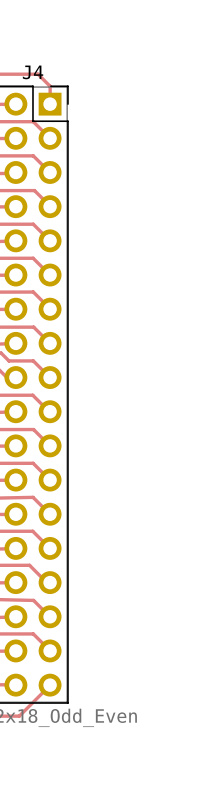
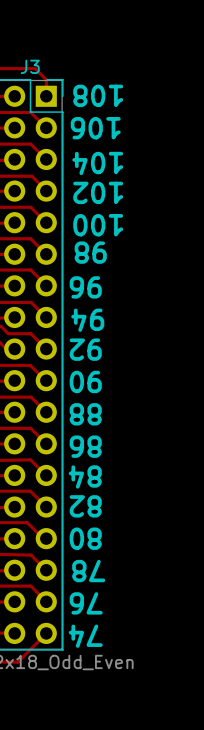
J4 name: J4 (33, 72) -> J3 (30, 66)
text: none -> 108 (98, 95)
text: none -> 106 (95, 128)
text: none -> 104 (97, 163)
text: none -> 102 (98, 192)
text: none -> 100 (98, 225)
text: none -> 98 (90, 252)
text: none -> 96 (85, 287)
text: none -> 94 (87, 320)
text: none -> 92 (85, 349)
text: none -> 90 (85, 381)
text: none -> 88 (85, 414)
text: none -> 86 (85, 446)
text: none -> 84 (85, 476)
text: none -> 82 (85, 506)
text: none -> 80 (85, 538)
text: none -> 78 (88, 571)
text: none -> 76 (86, 603)
text: none -> 74 (85, 636)

